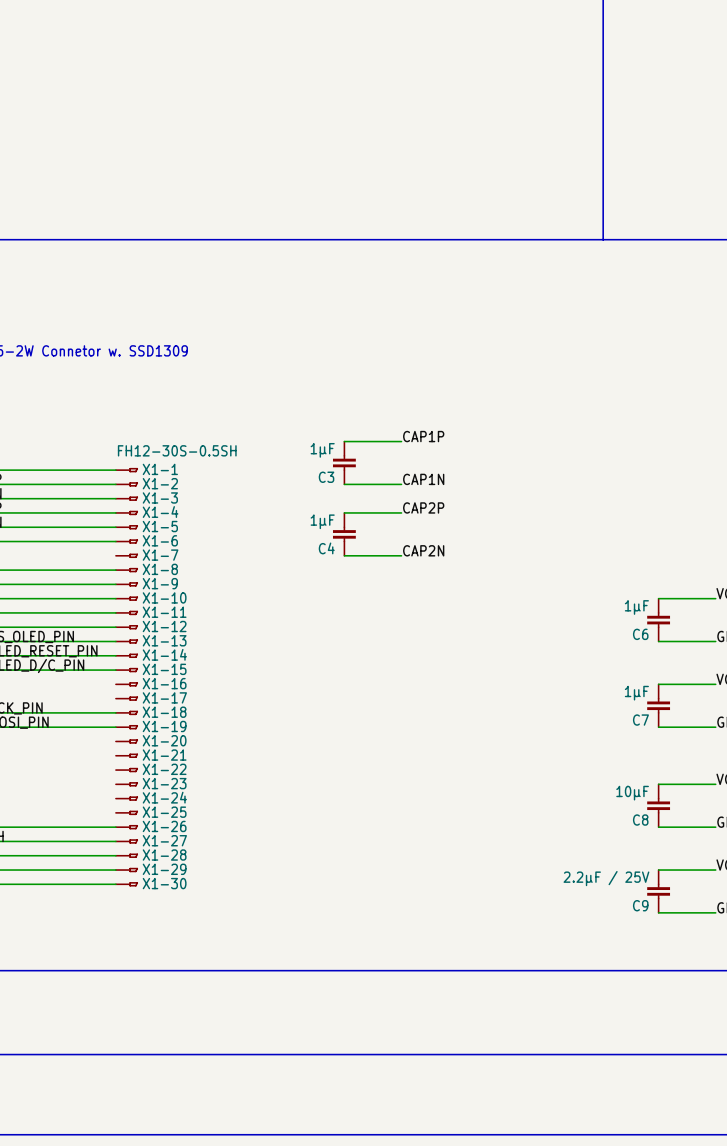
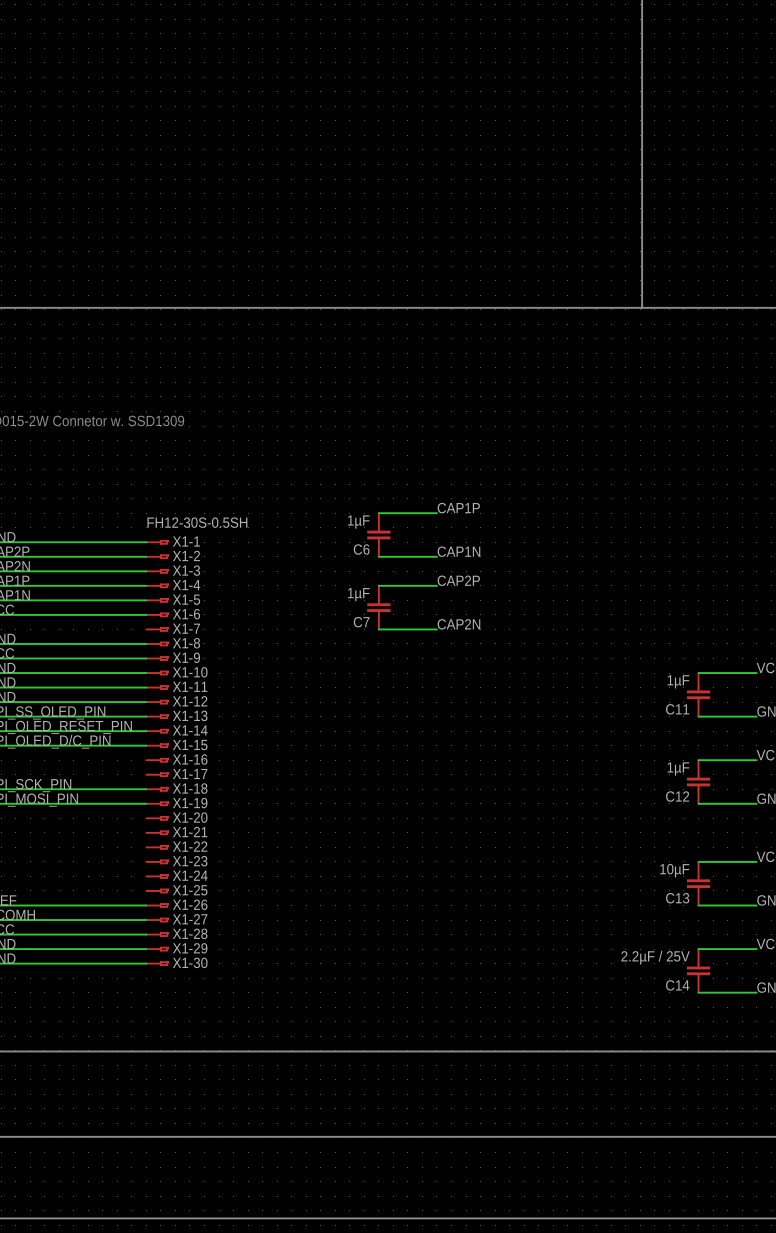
C3 name: C3 (326, 477) -> C6 (361, 549)
C4 name: C4 (326, 548) -> C7 (361, 622)
C6 name: C6 (640, 634) -> C11 (677, 709)
C7 name: C7 (640, 720) -> C12 (677, 796)
C8 name: C8 (640, 820) -> C13 (677, 898)
C9 name: C9 (640, 905) -> C14 (677, 985)

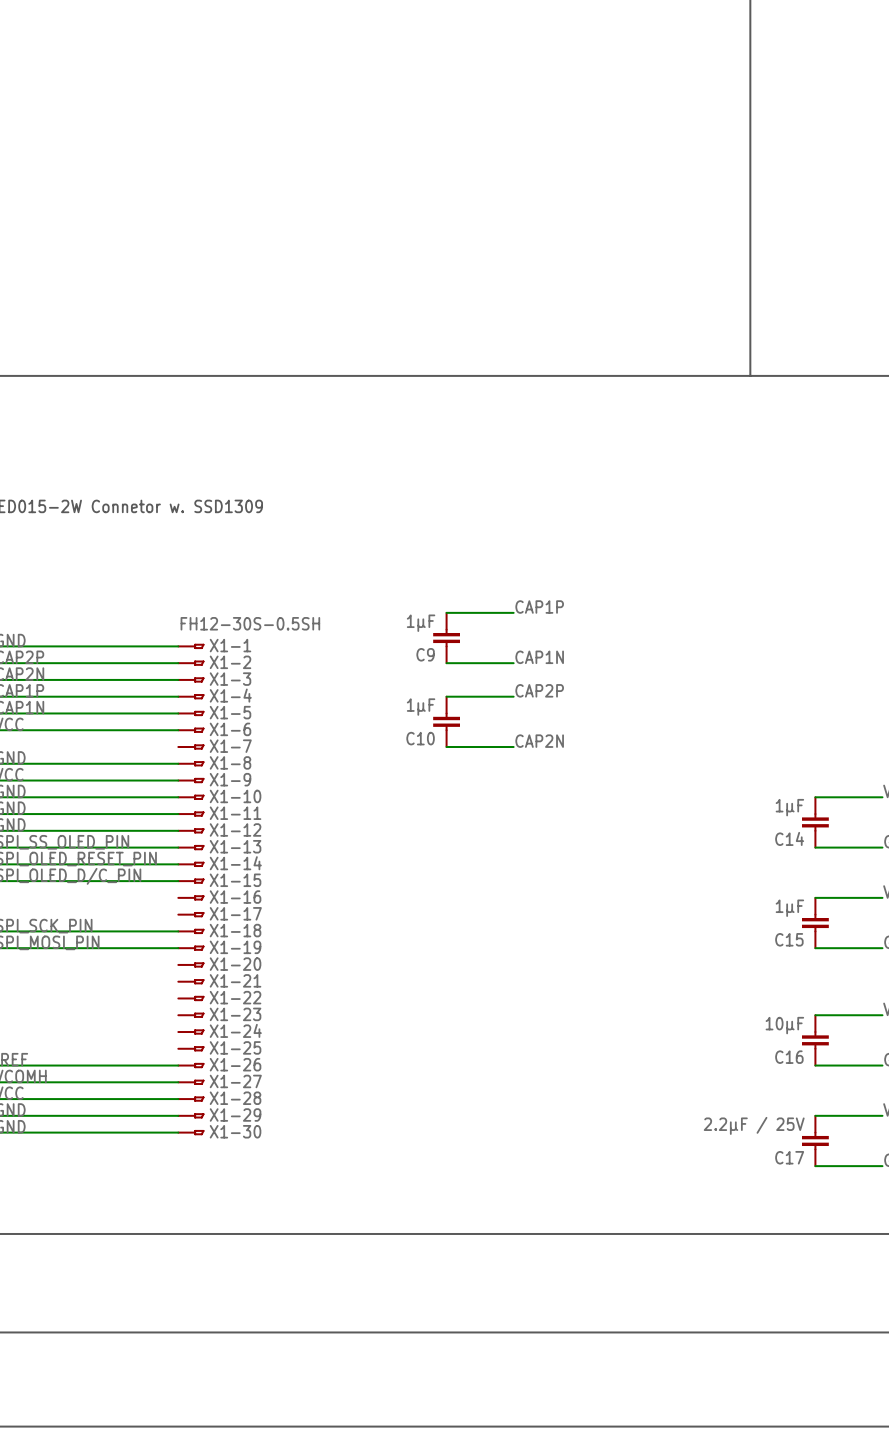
C6 name: C6 (361, 549) -> C9 (425, 654)
C7 name: C7 (361, 622) -> C10 (420, 738)
C11 name: C11 (677, 709) -> C14 (789, 838)
C12 name: C12 (677, 796) -> C15 (789, 939)
C13 name: C13 (677, 898) -> C16 (789, 1057)
C14 name: C14 (677, 985) -> C17 (789, 1157)

